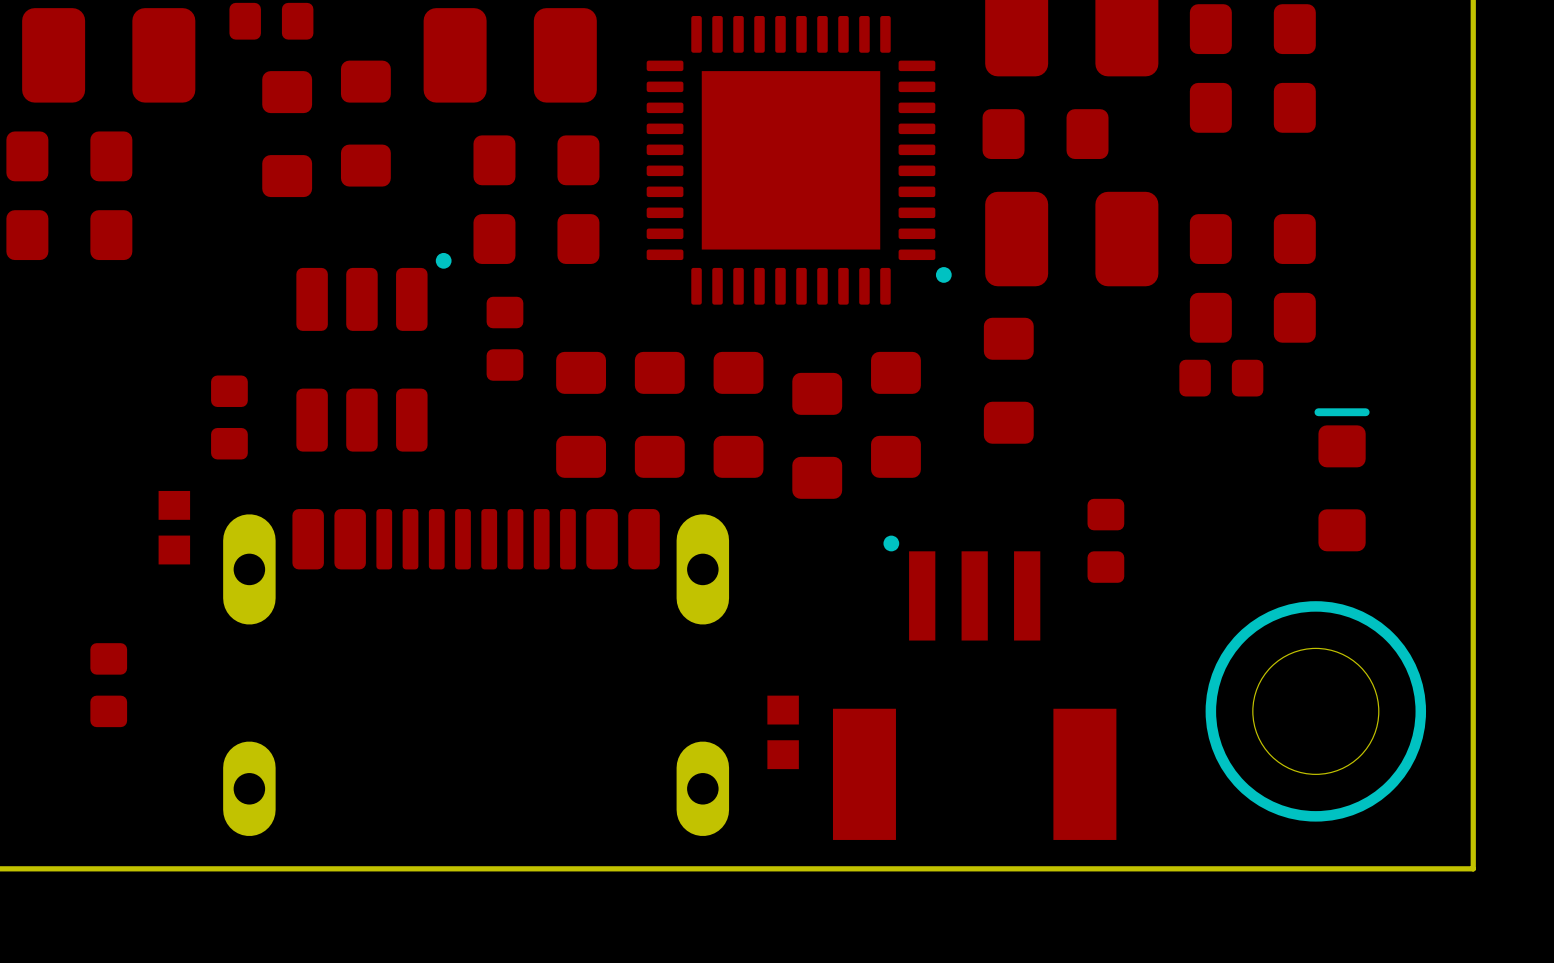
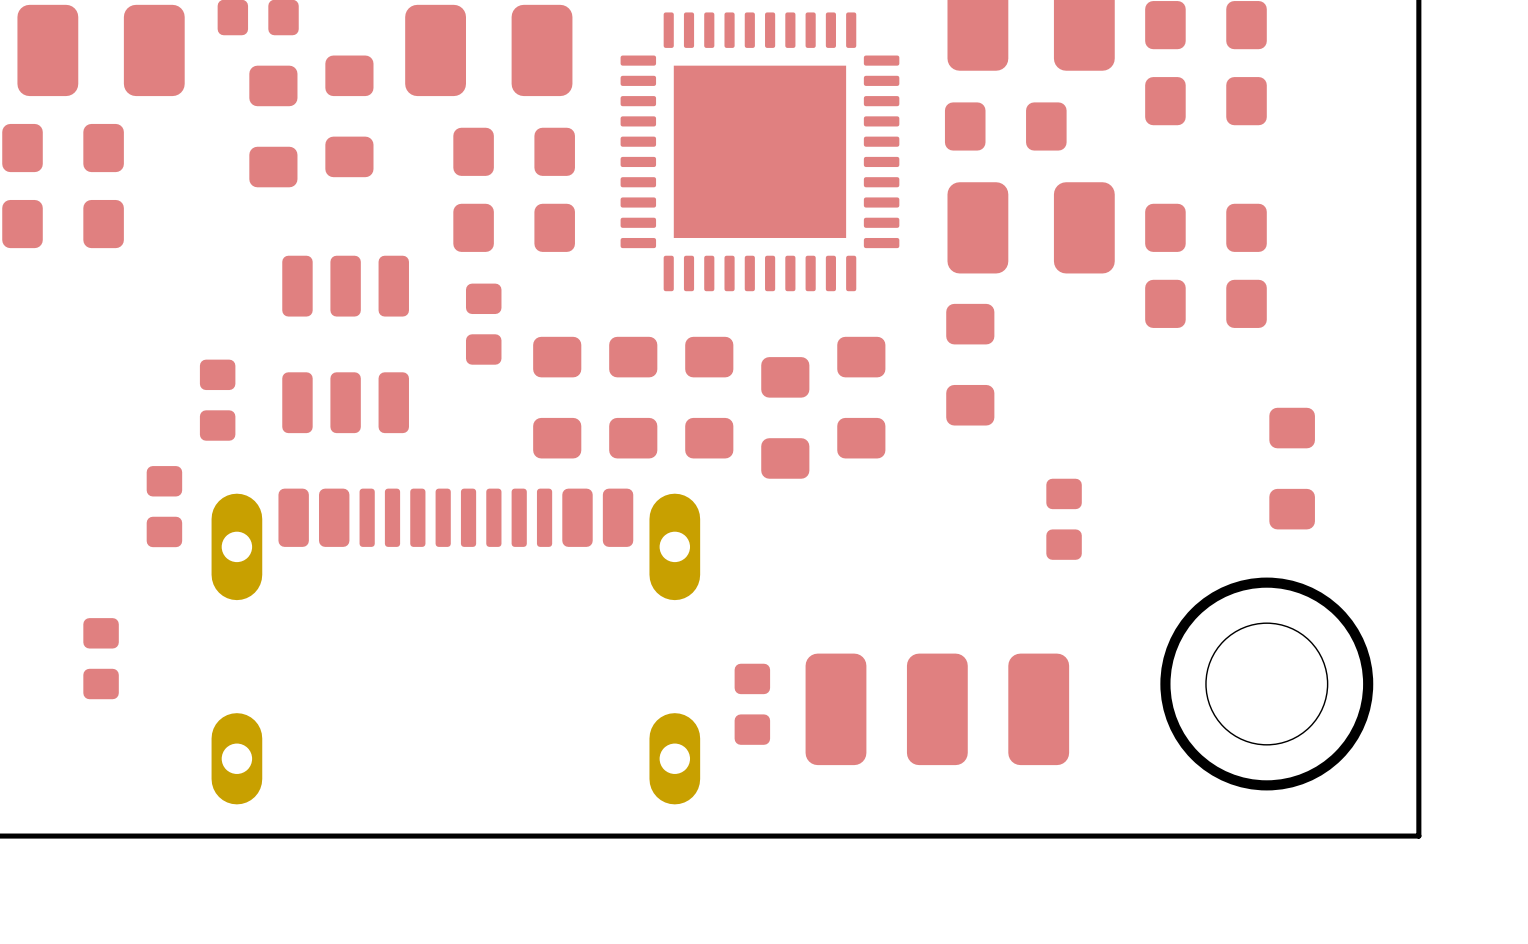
part footprint: [646, 16, 952, 305] -> [620, 12, 900, 292]
part footprint: [296, 252, 452, 452] -> [282, 255, 409, 434]
part: (1221, 378) -> none
part footprint: [1314, 408, 1370, 552] -> [1269, 407, 1315, 530]
part footprint: [158, 490, 191, 565] -> [146, 466, 183, 548]
part footprint: [832, 535, 1117, 840] -> [805, 653, 1070, 766]
part footprint: [767, 695, 799, 770] -> [734, 663, 771, 745]

